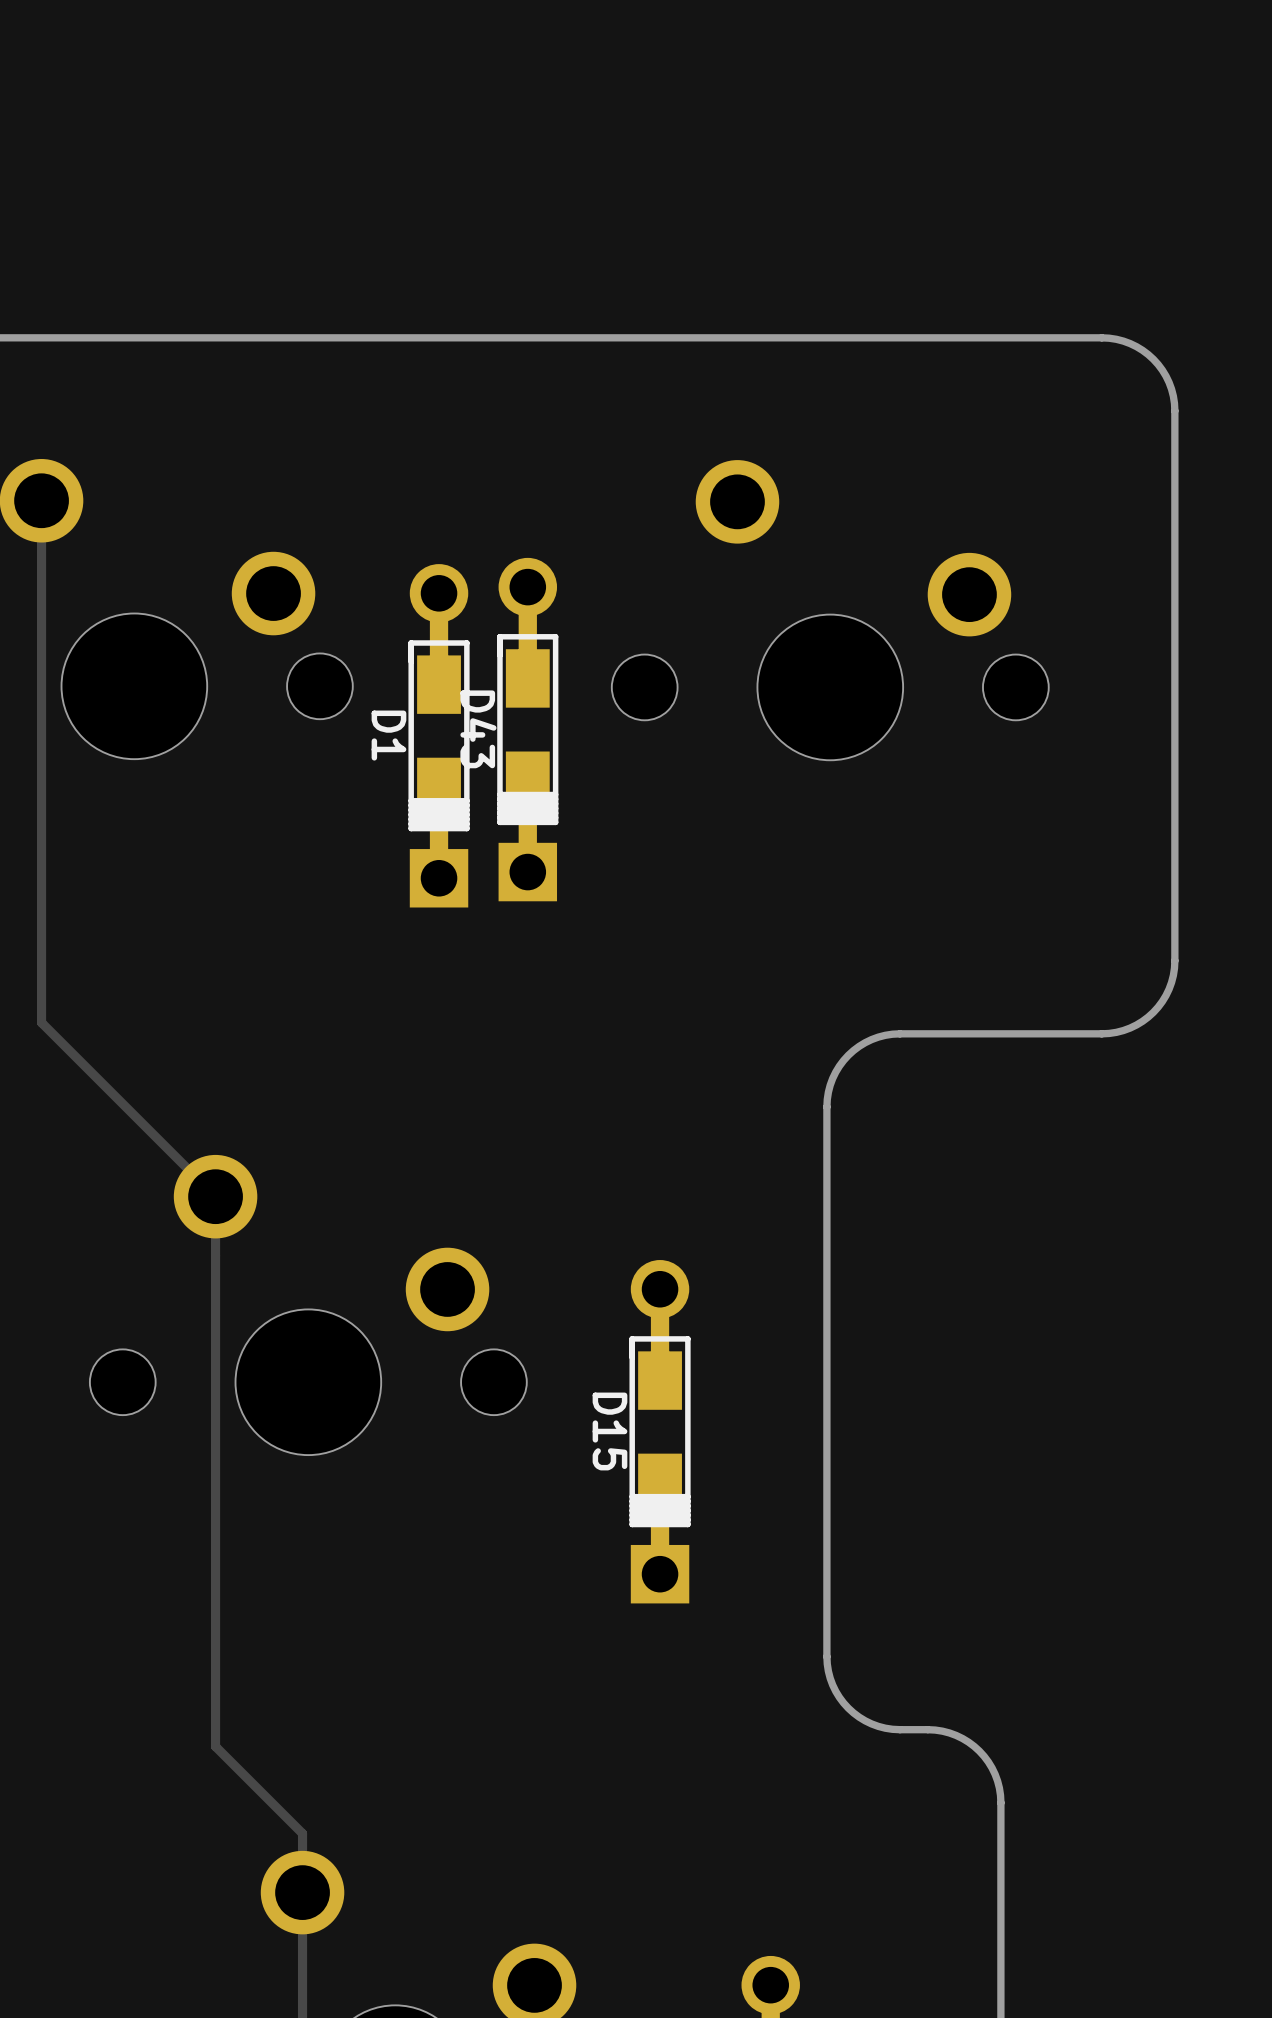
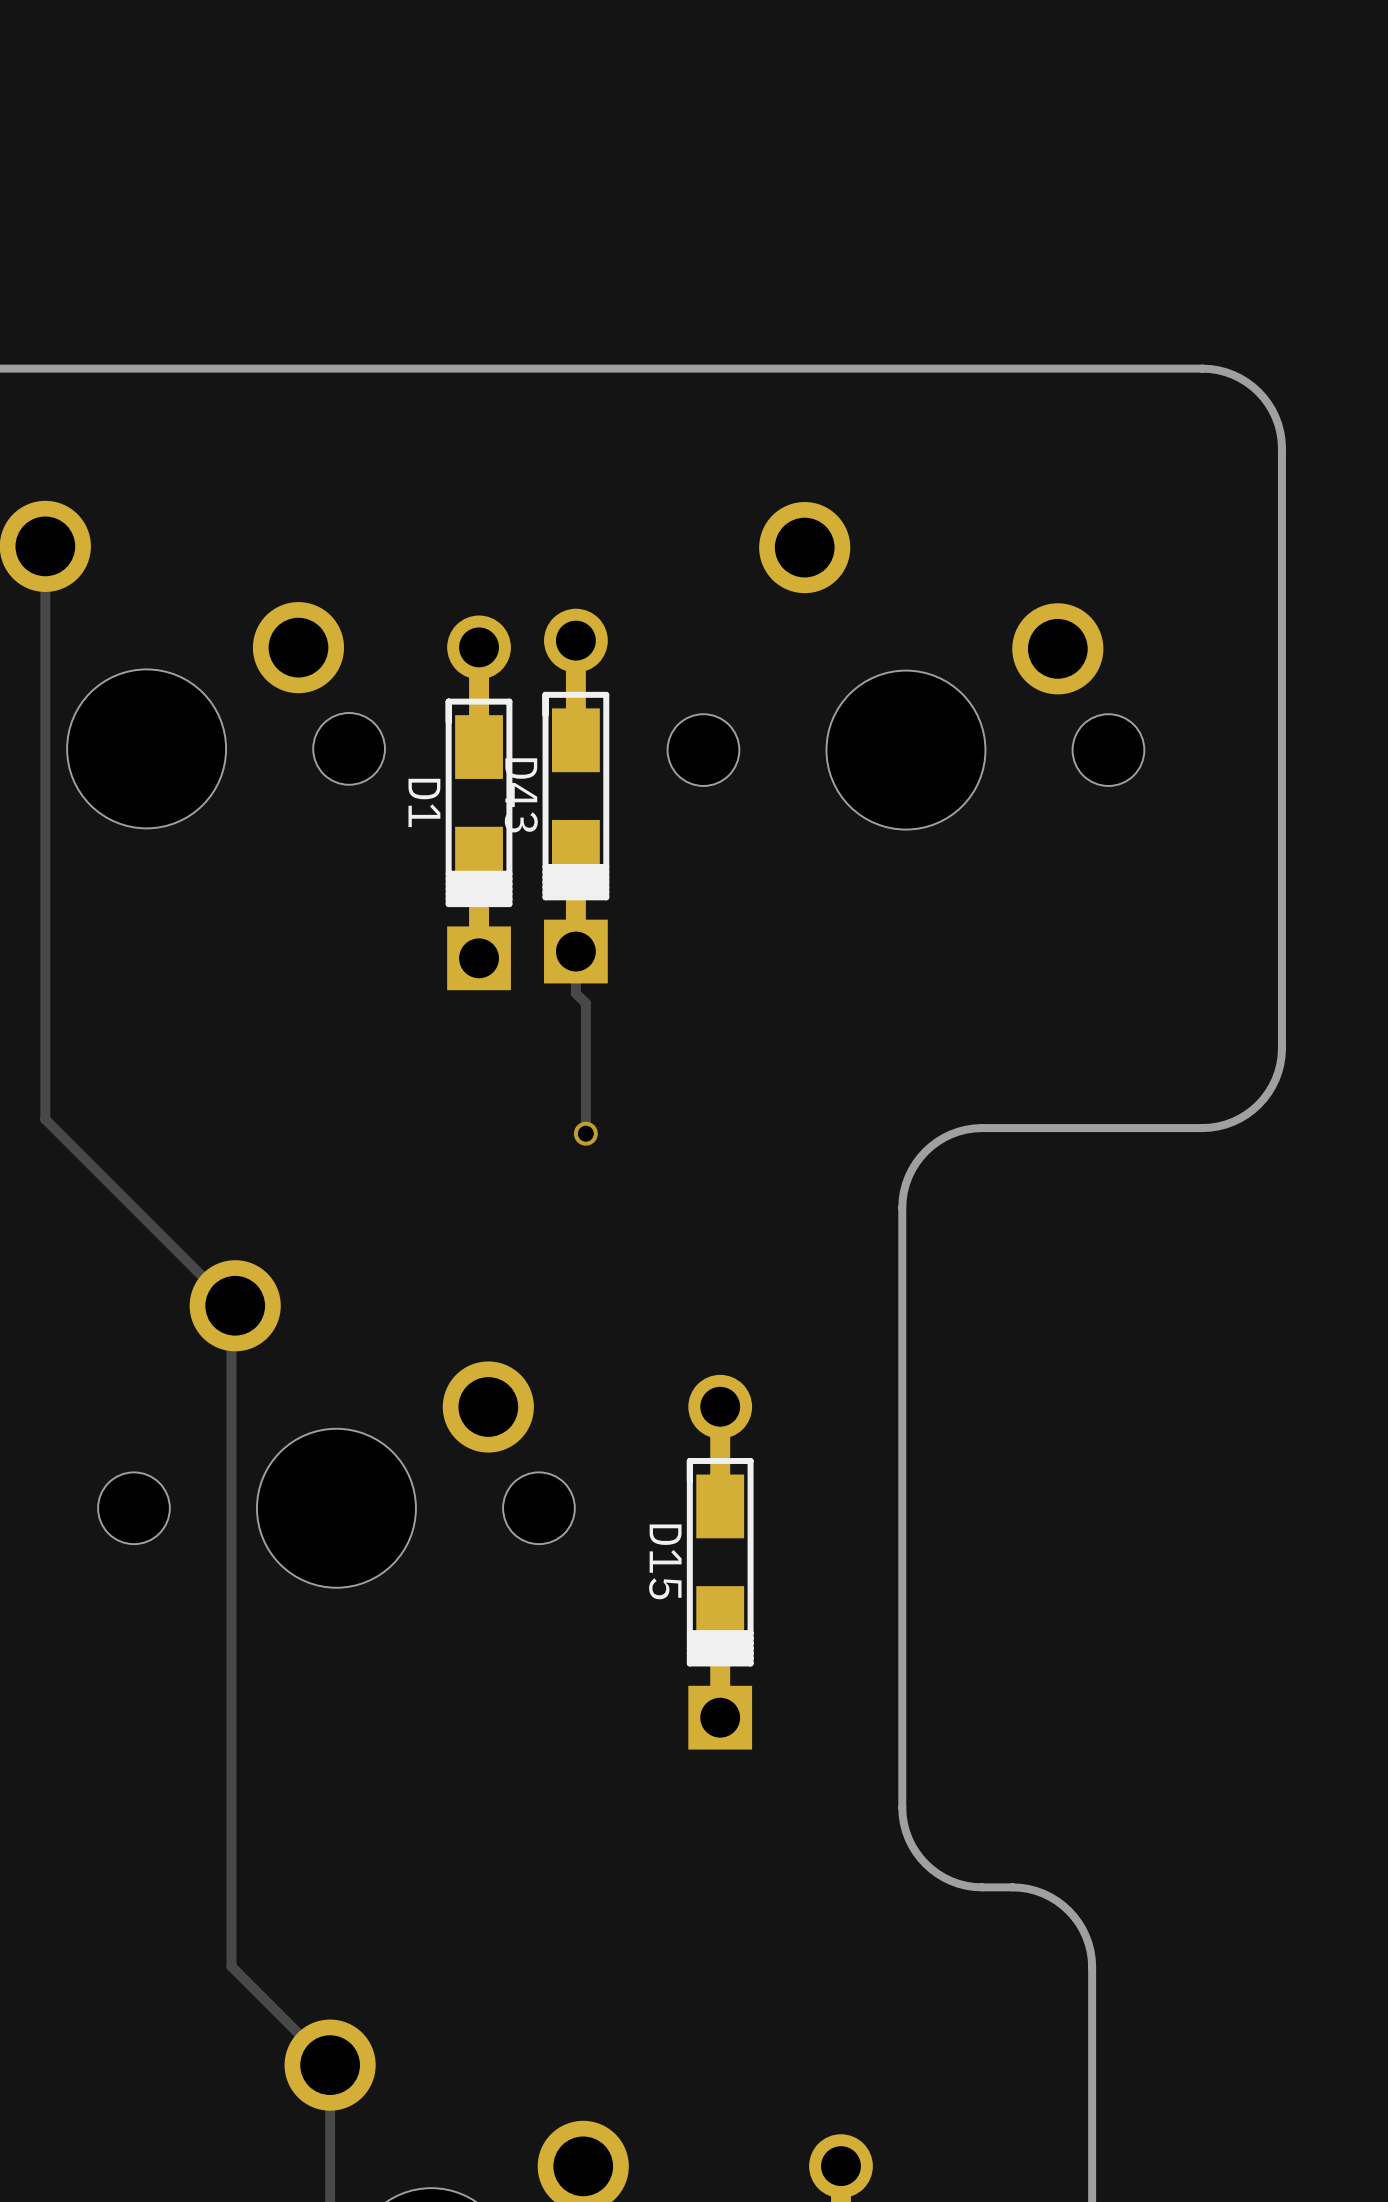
track: none -> (575, 951) (575, 993) (585, 1003) (585, 1133)
track: (41, 1022) (215, 1196) (215, 1746) (302, 1833) (302, 1892) -> (45, 1115) (45, 1119) (231, 1305) (231, 1966) (330, 2065)
via: none -> (585, 1133)

